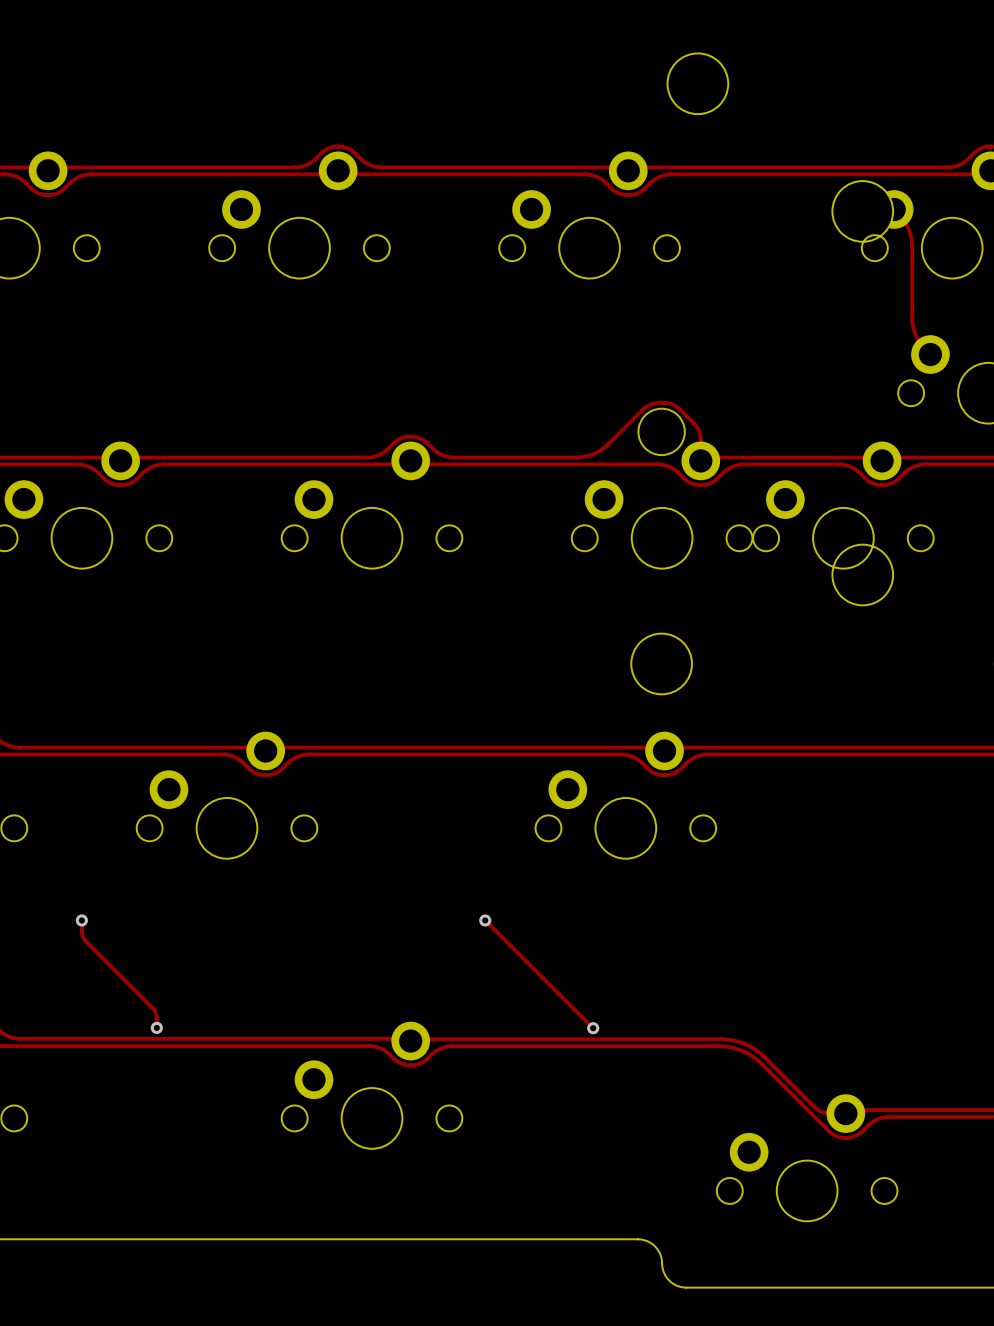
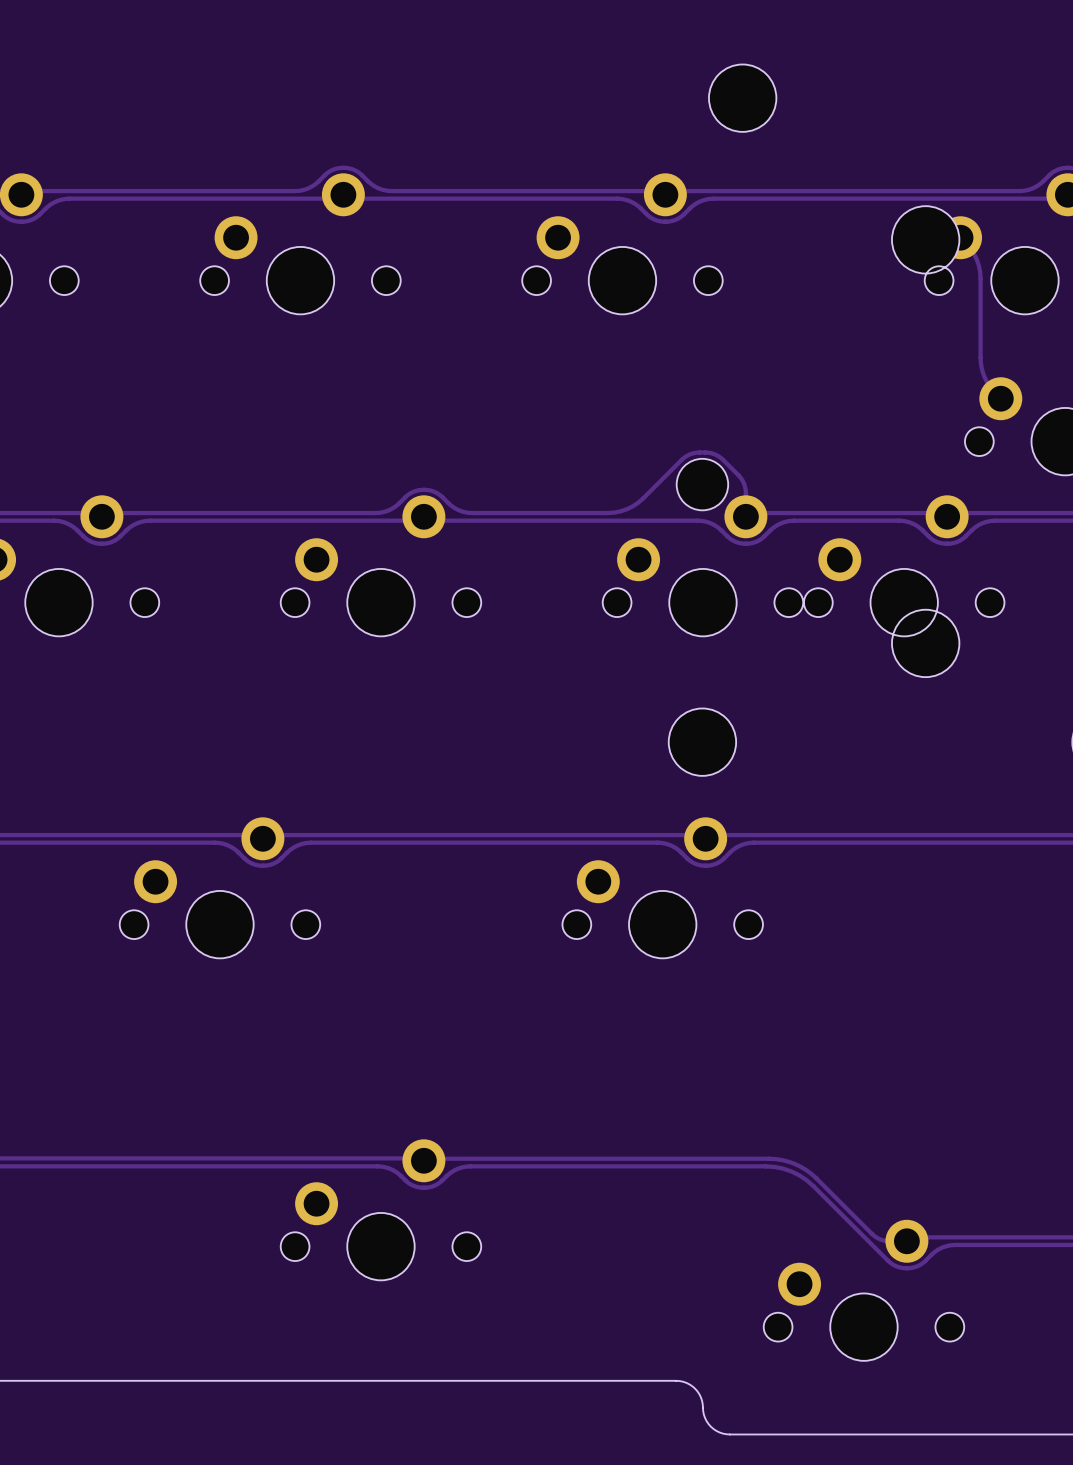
track: (81, 920) (81, 932) (84, 939) (153, 1008) (156, 1015) (156, 1027) -> none
via: (81, 920) -> none
track: (485, 920) (593, 1028) -> none
via: (485, 920) -> none
via: (156, 1027) -> none
via: (593, 1028) -> none

